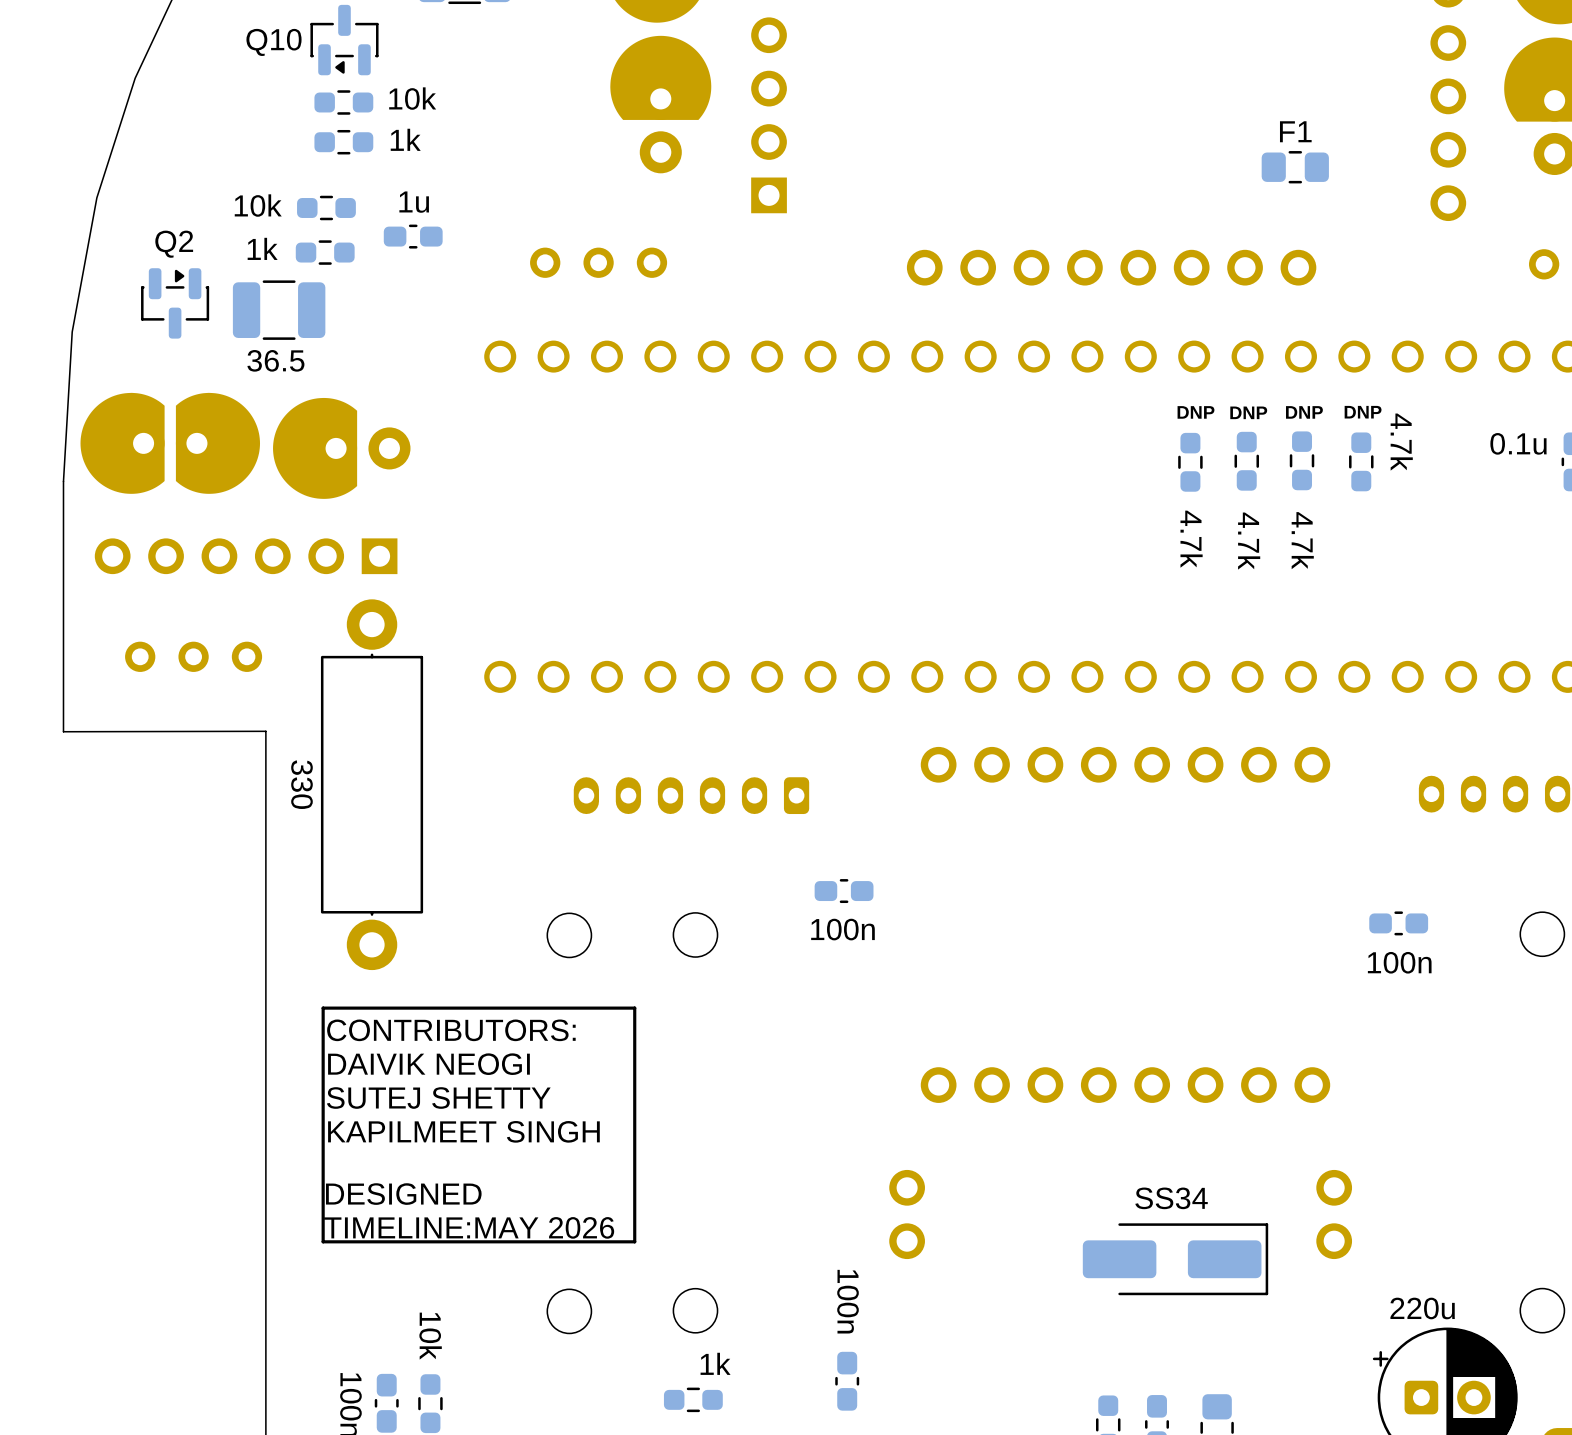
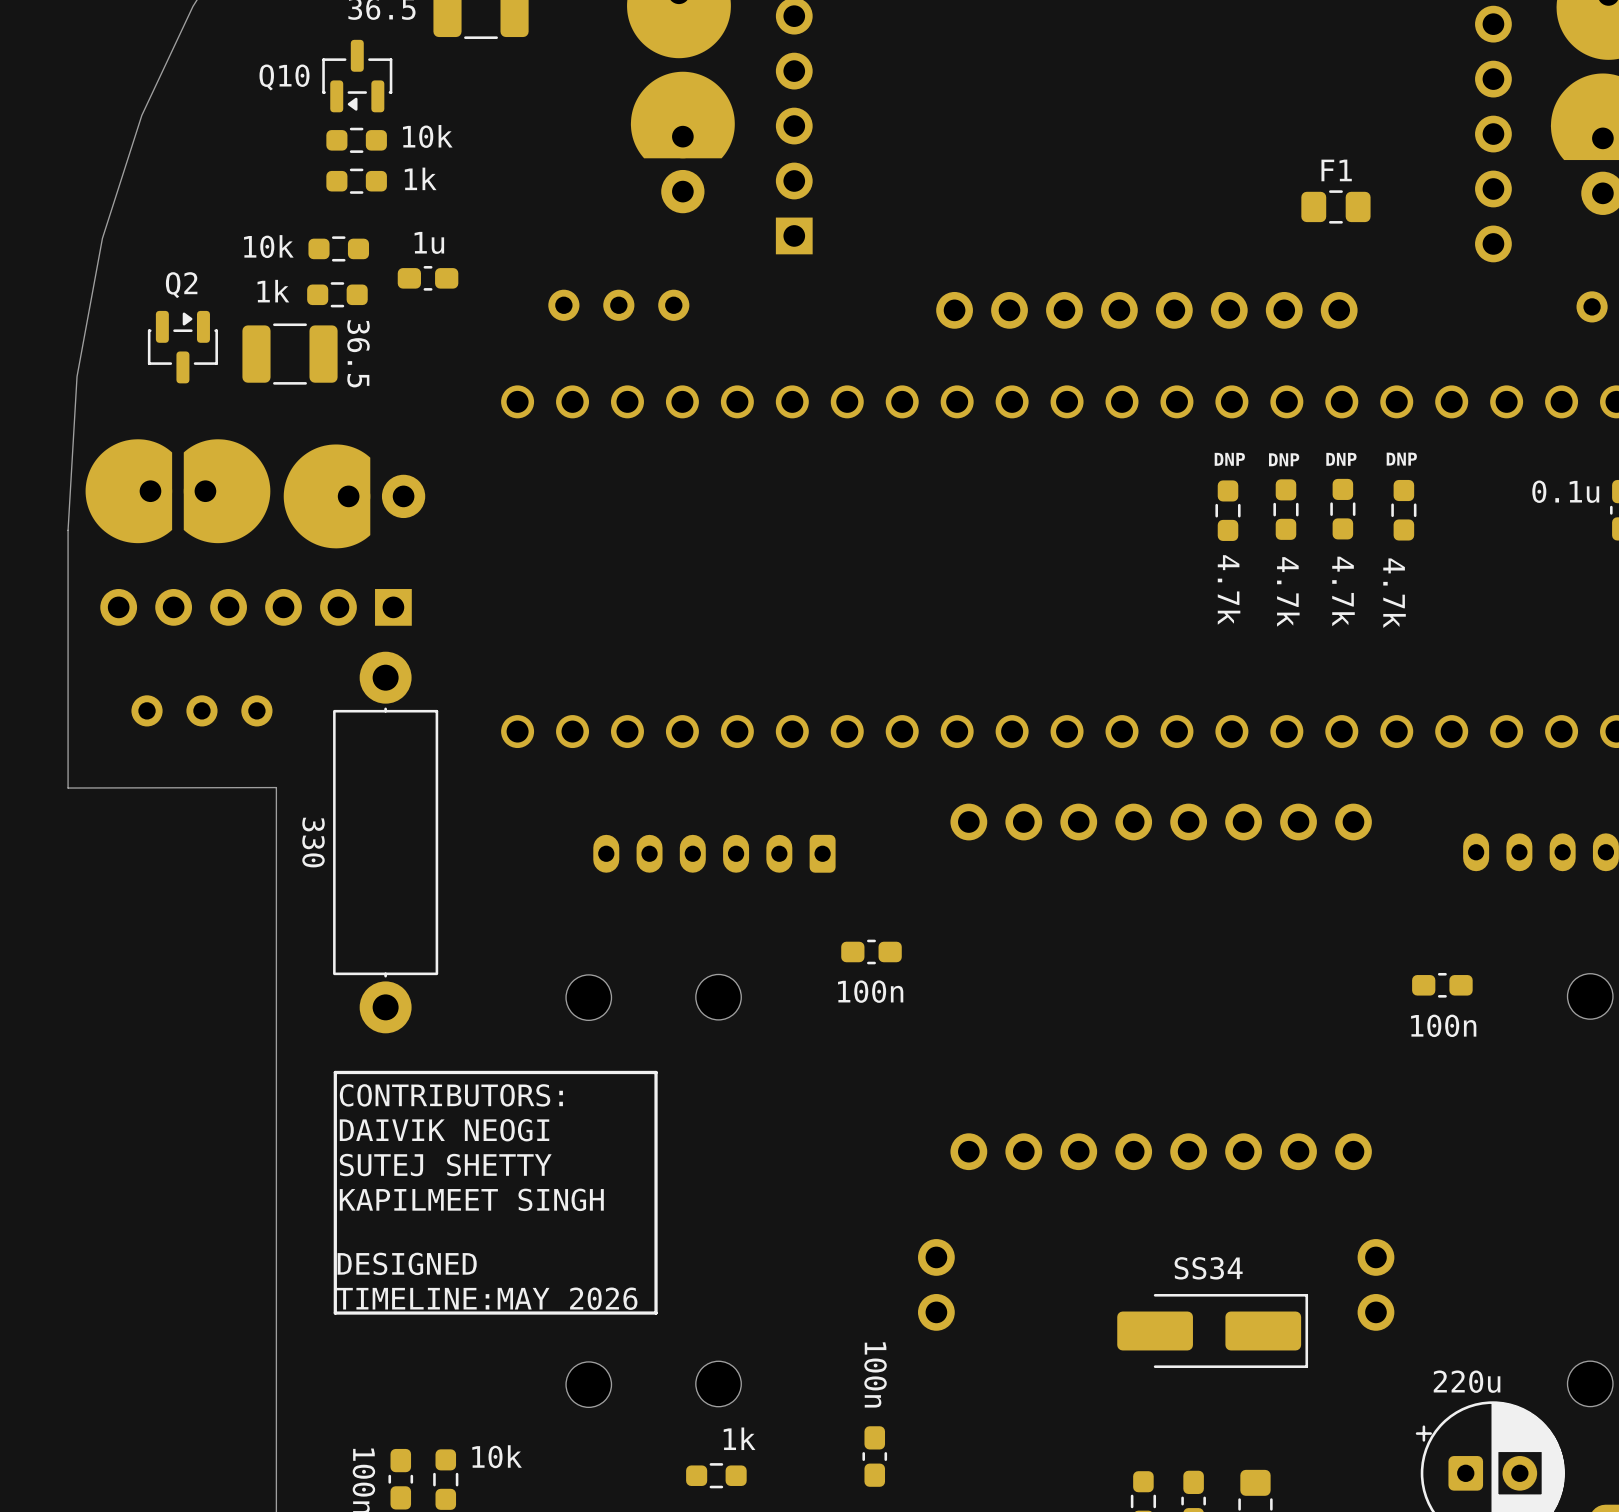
part value rotation: 0° (275, 360) -> 90° clockwise (358, 353)
part value position: 4.7k (1401, 442) -> 4.7k (1394, 593)
part value rotation: 0° (430, 1336) -> 90° counterclockwise (497, 1456)

